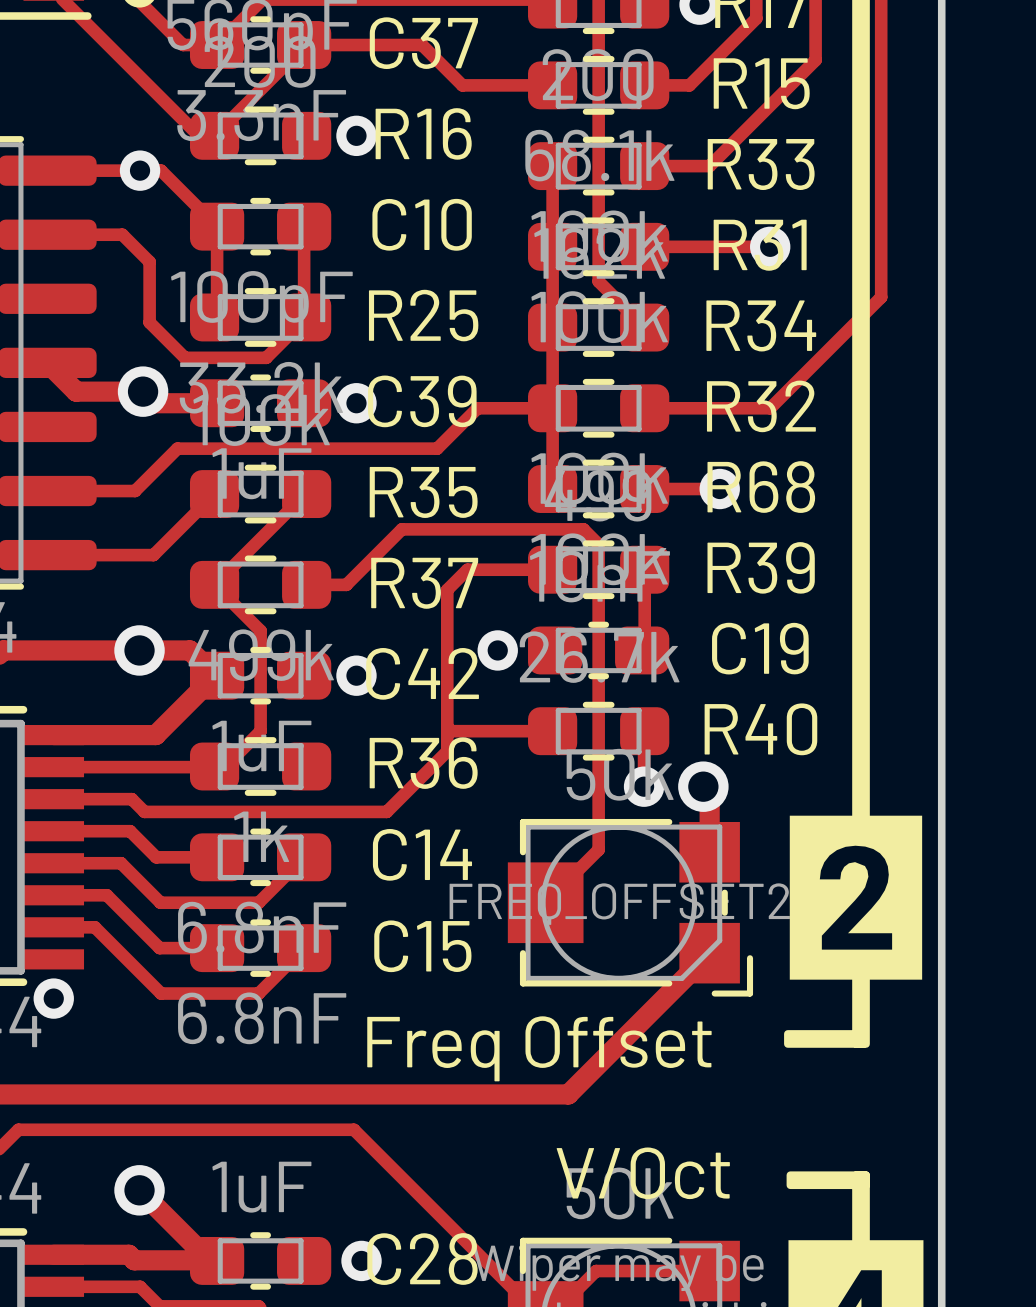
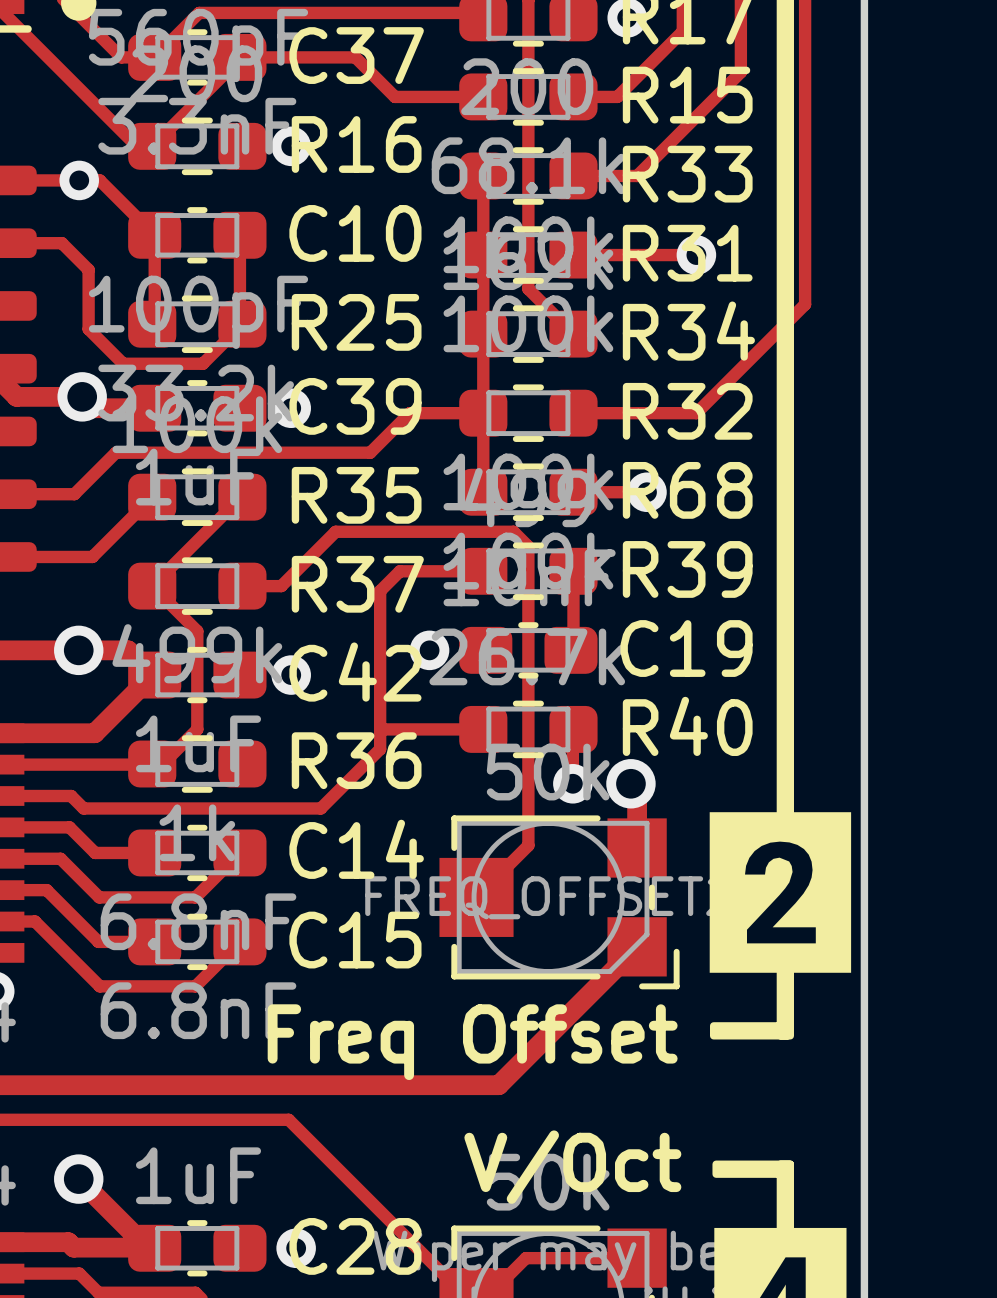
drawing shape: [789, 815, 923, 980] -> [709, 812, 852, 973]

